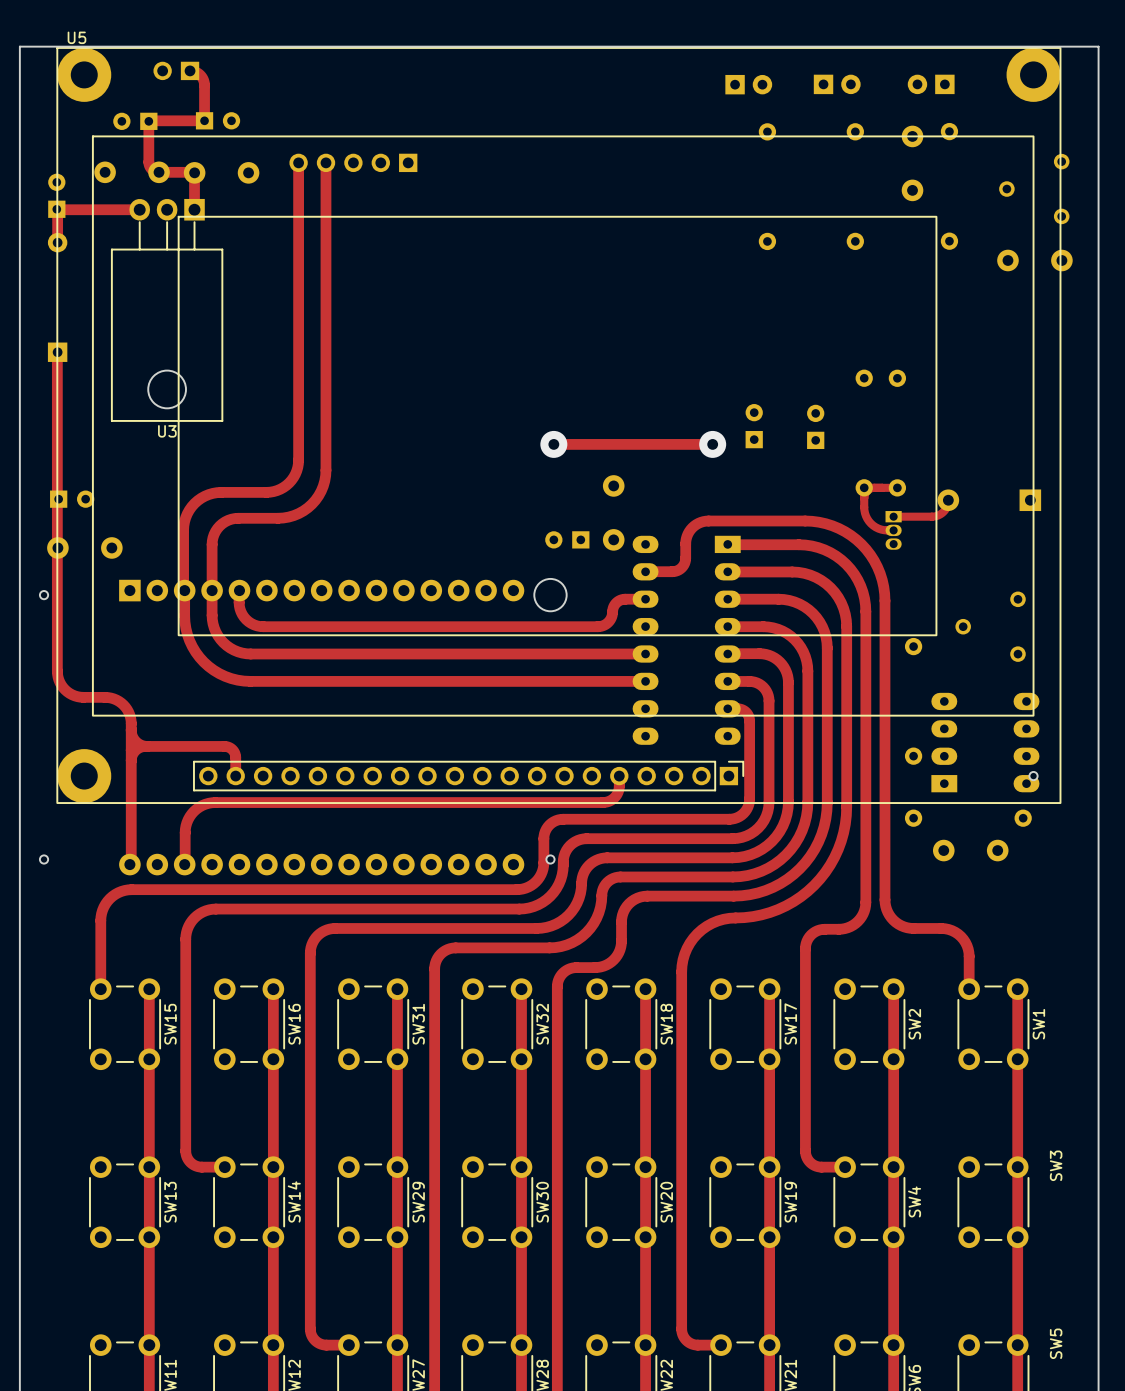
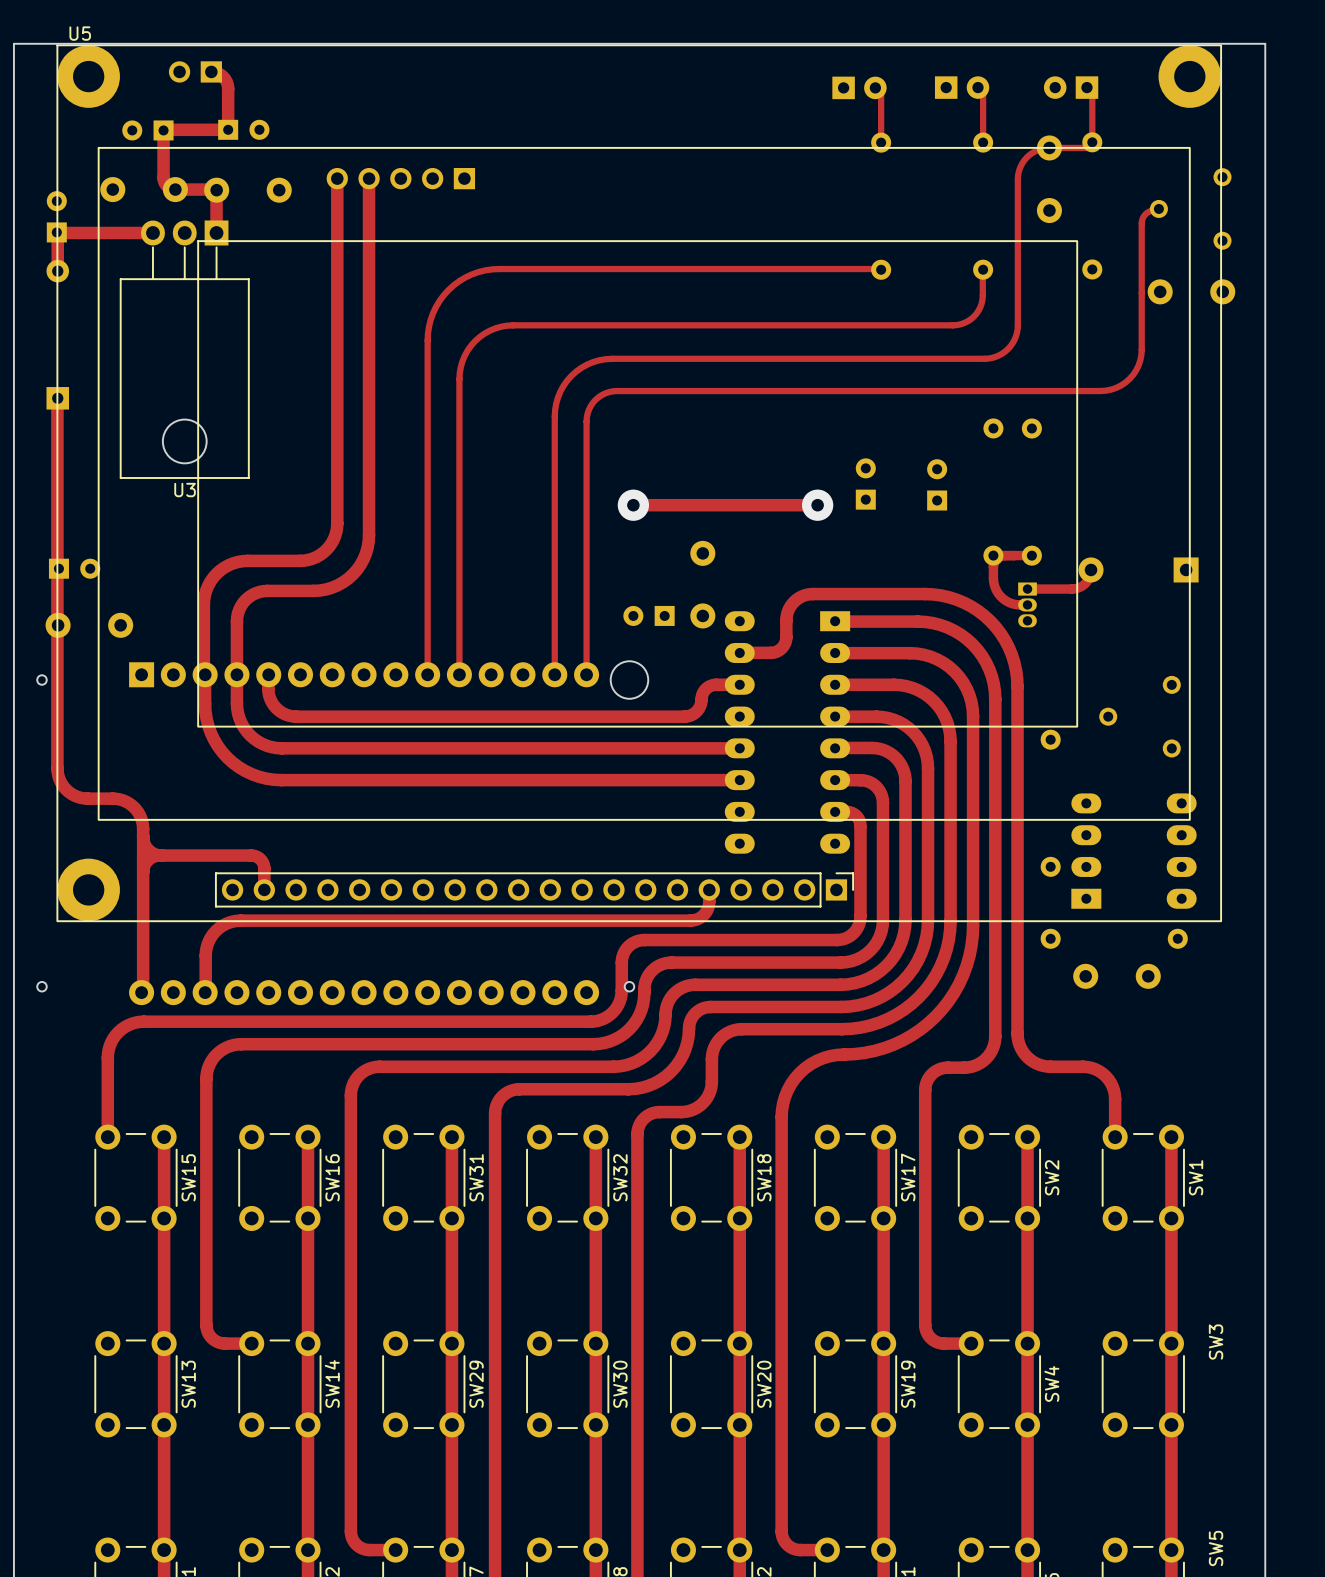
U5 footprint: [56, 47, 1062, 804] -> [56, 44, 1222, 922]
track: none -> (875, 87) (881, 92) (881, 142)
track: none -> (977, 87) (983, 92) (983, 142)
track: none -> (1086, 87) (1092, 92) (1091, 145) (1087, 147) (1039, 149) (1027, 157) (1019, 169) (1017, 179) (1017, 329) (1012, 343) (1002, 353) (984, 358) (612, 358) (593, 362) (571, 375) (560, 391) (555, 409) (554, 674)
track: none -> (1155, 210) (1146, 213) (1141, 222) (1140, 360) (1129, 378) (1111, 389) (617, 391) (609, 392) (598, 397) (588, 409) (586, 421) (586, 674)
track: none -> (881, 269) (499, 269) (471, 274) (453, 285) (436, 306) (427, 333) (427, 674)
track: none -> (983, 269) (980, 306) (971, 319) (956, 325) (513, 325) (495, 328) (479, 337) (464, 355) (459, 373) (459, 674)

